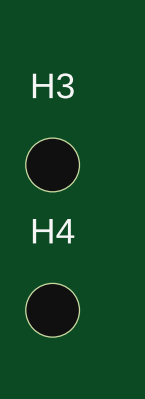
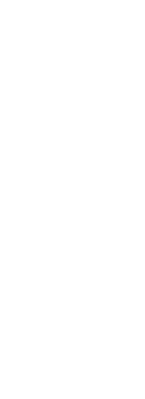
H3: (52, 164) -> none
H4: (52, 310) -> none

